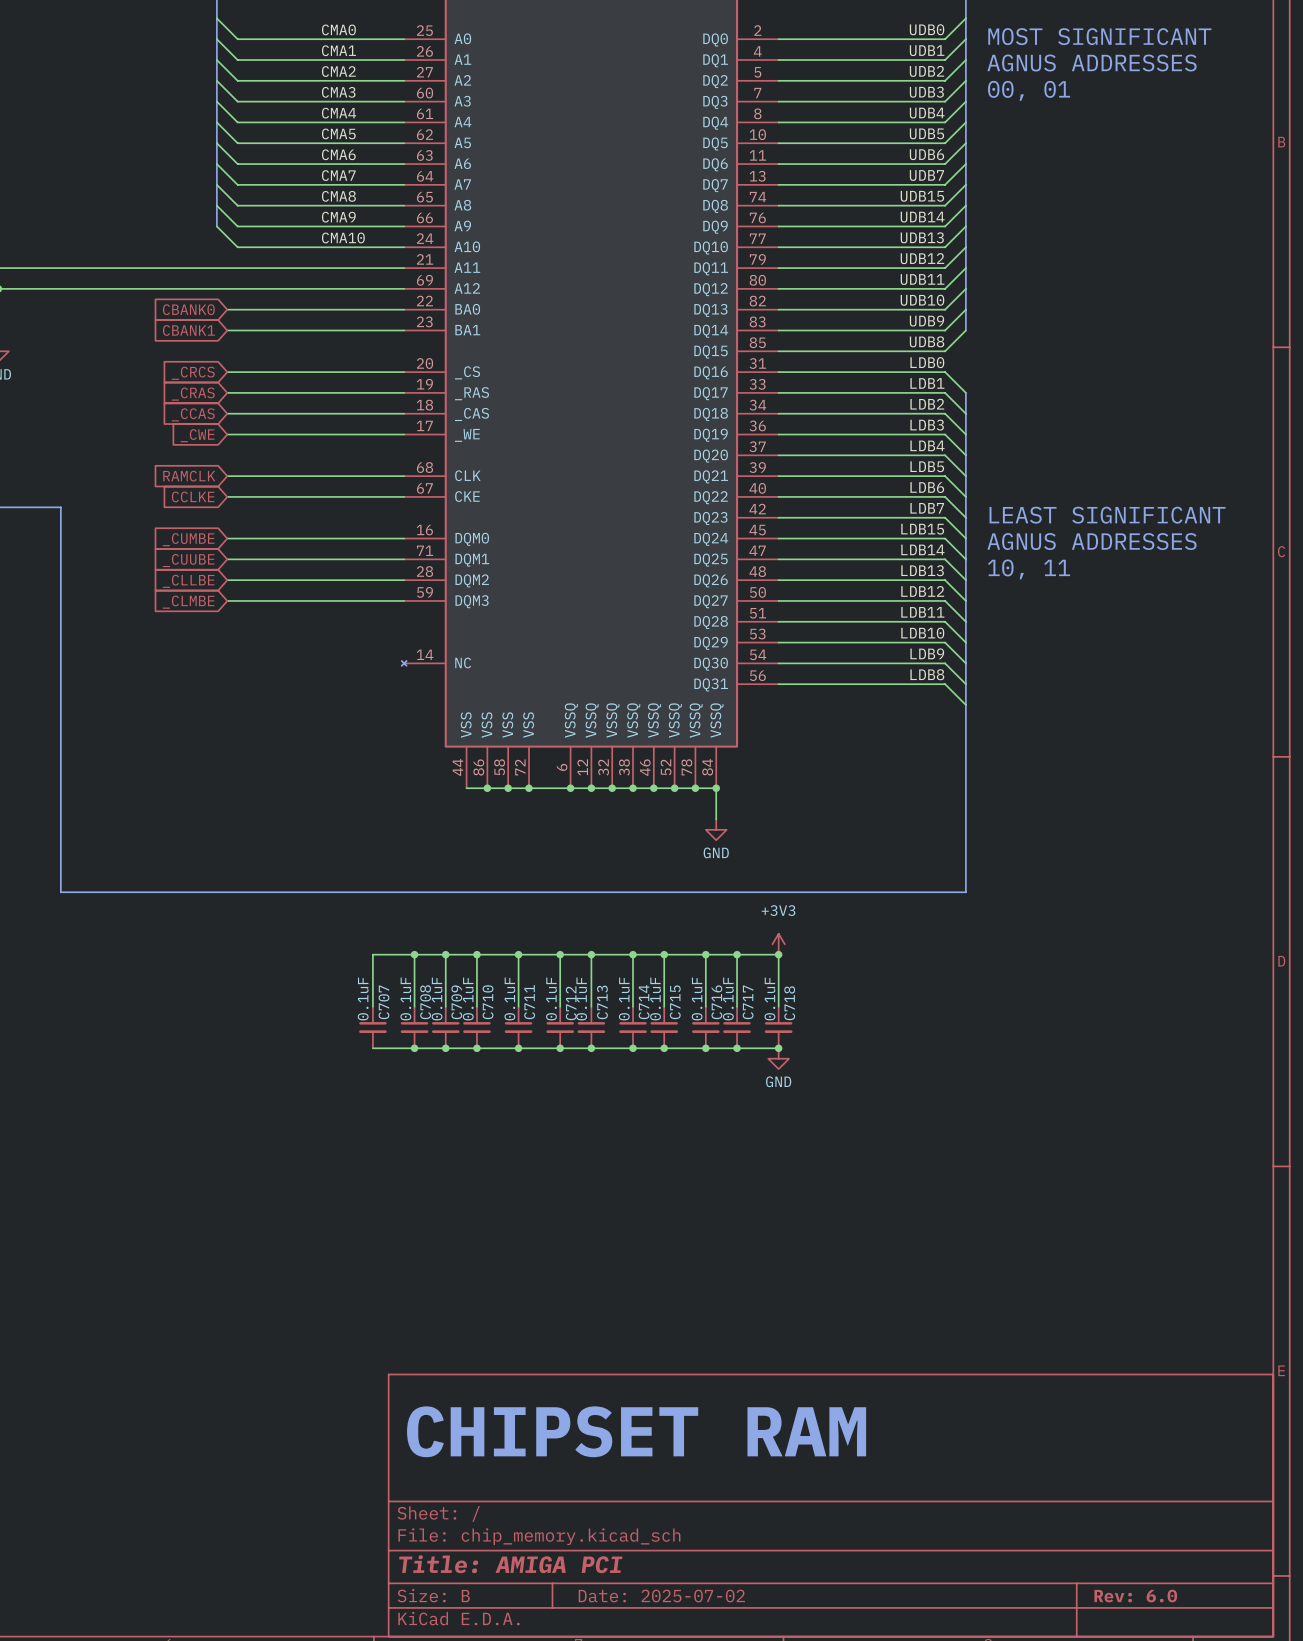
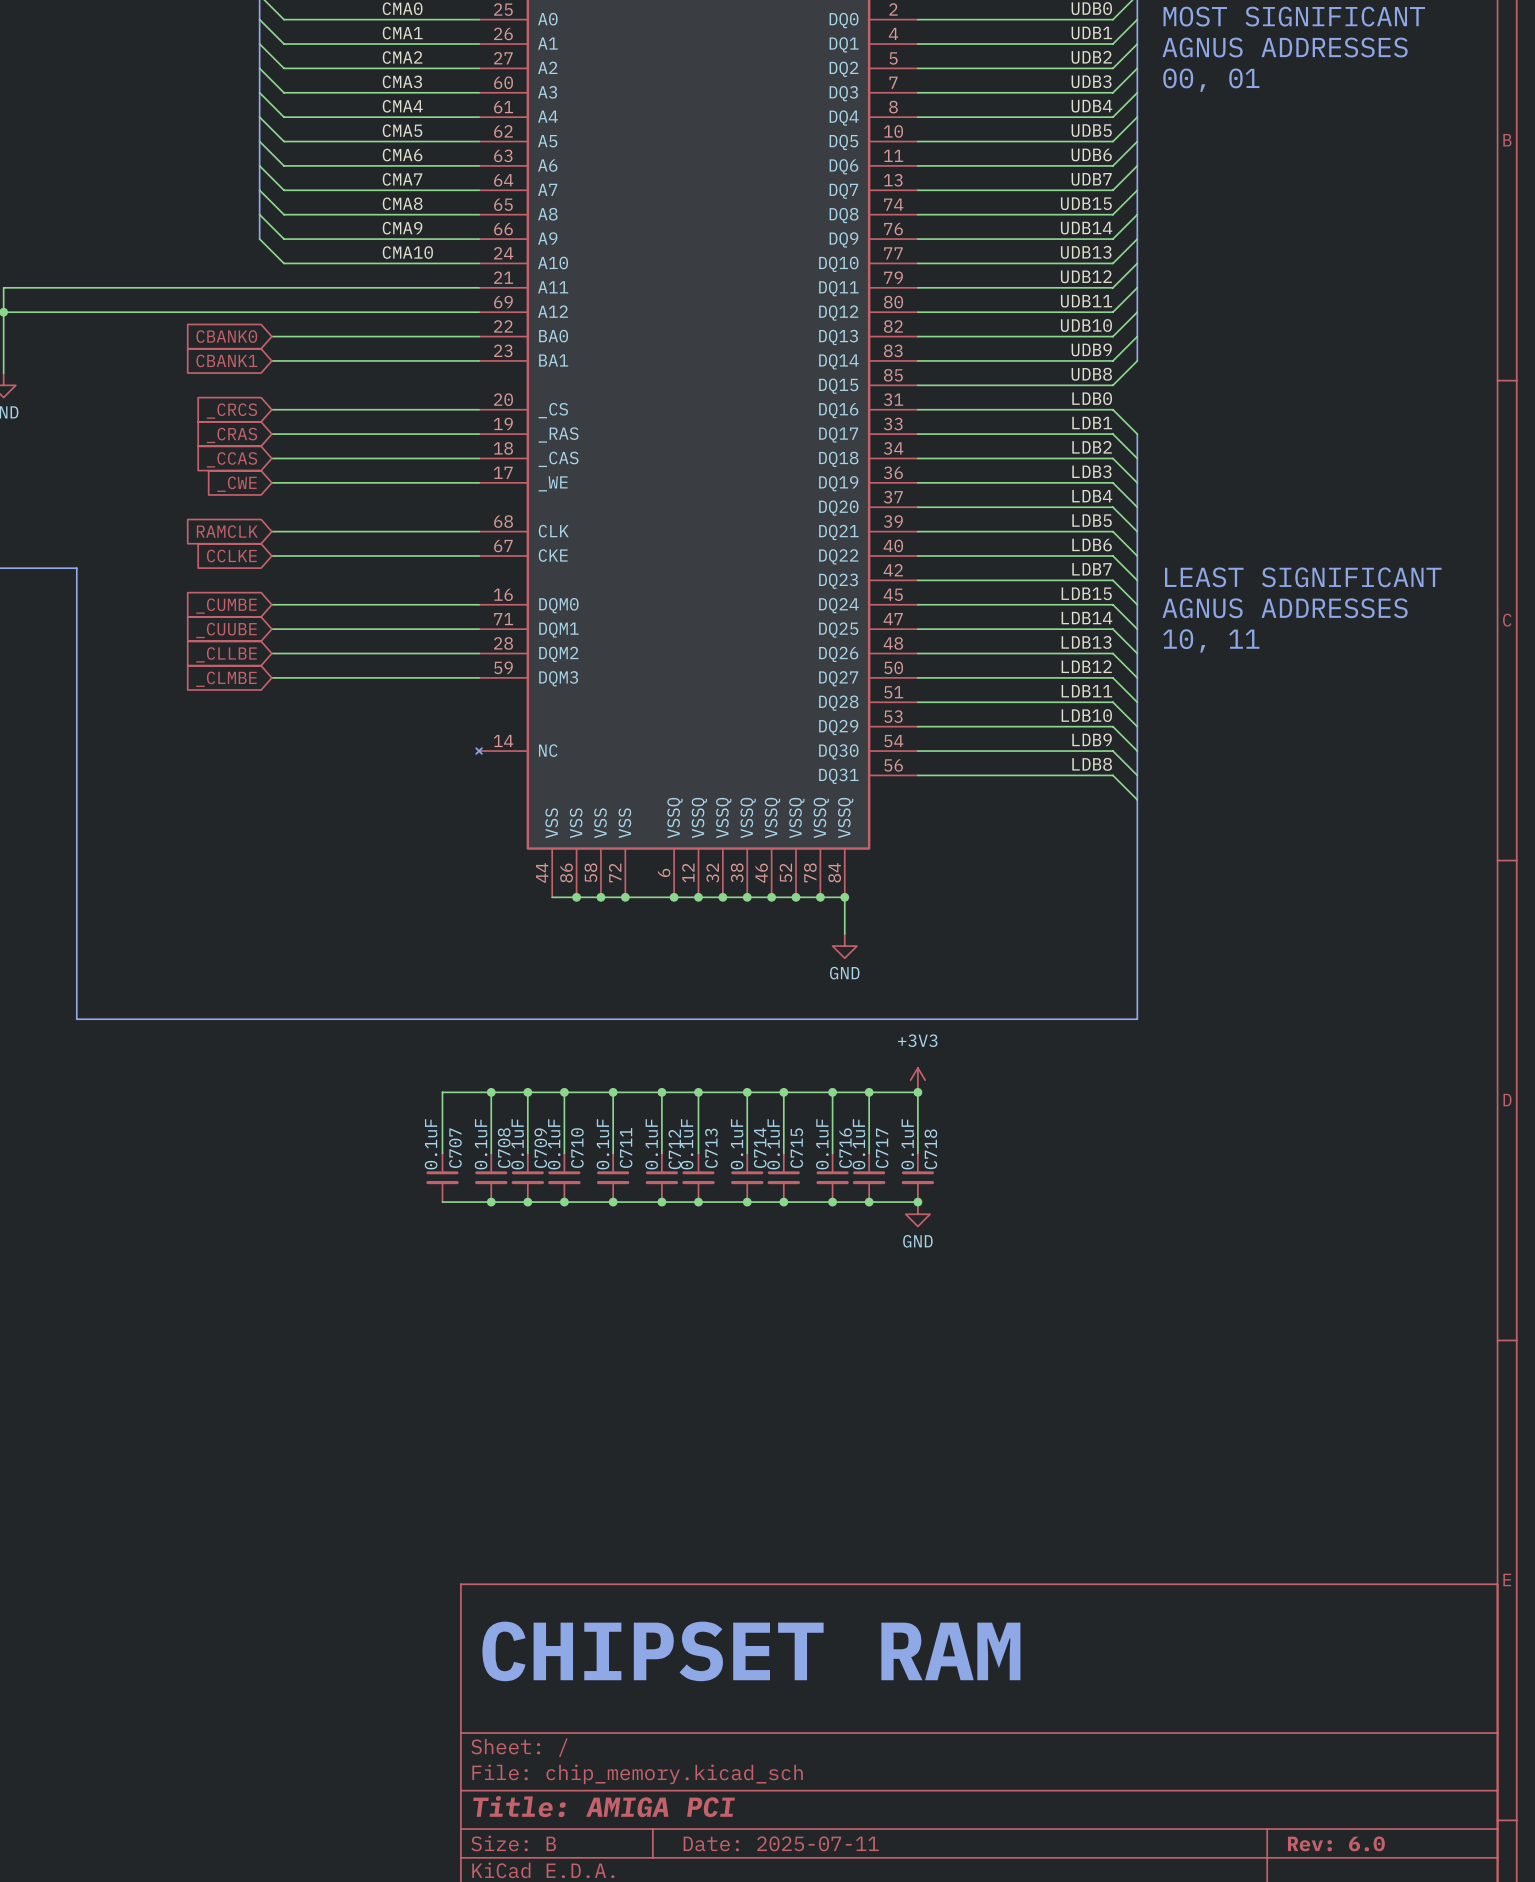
title block: Date: 2025-07-02 (661, 1596) -> Date: 2025-07-11 (781, 1843)

